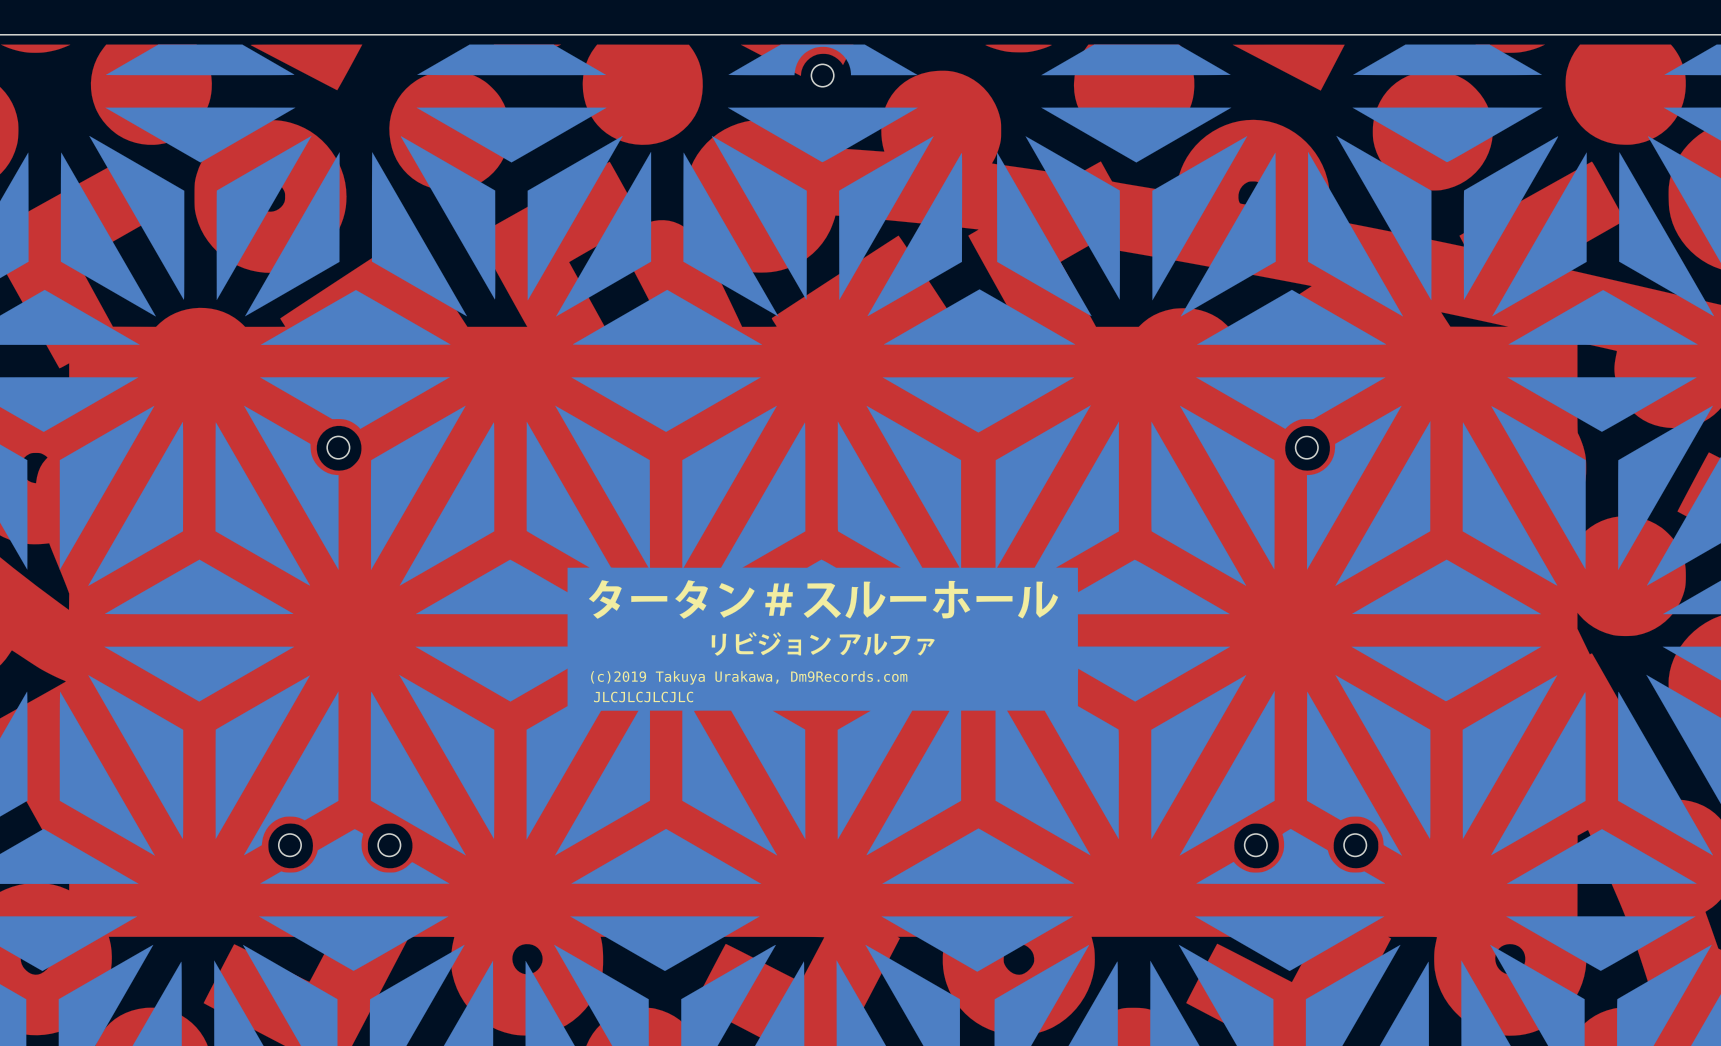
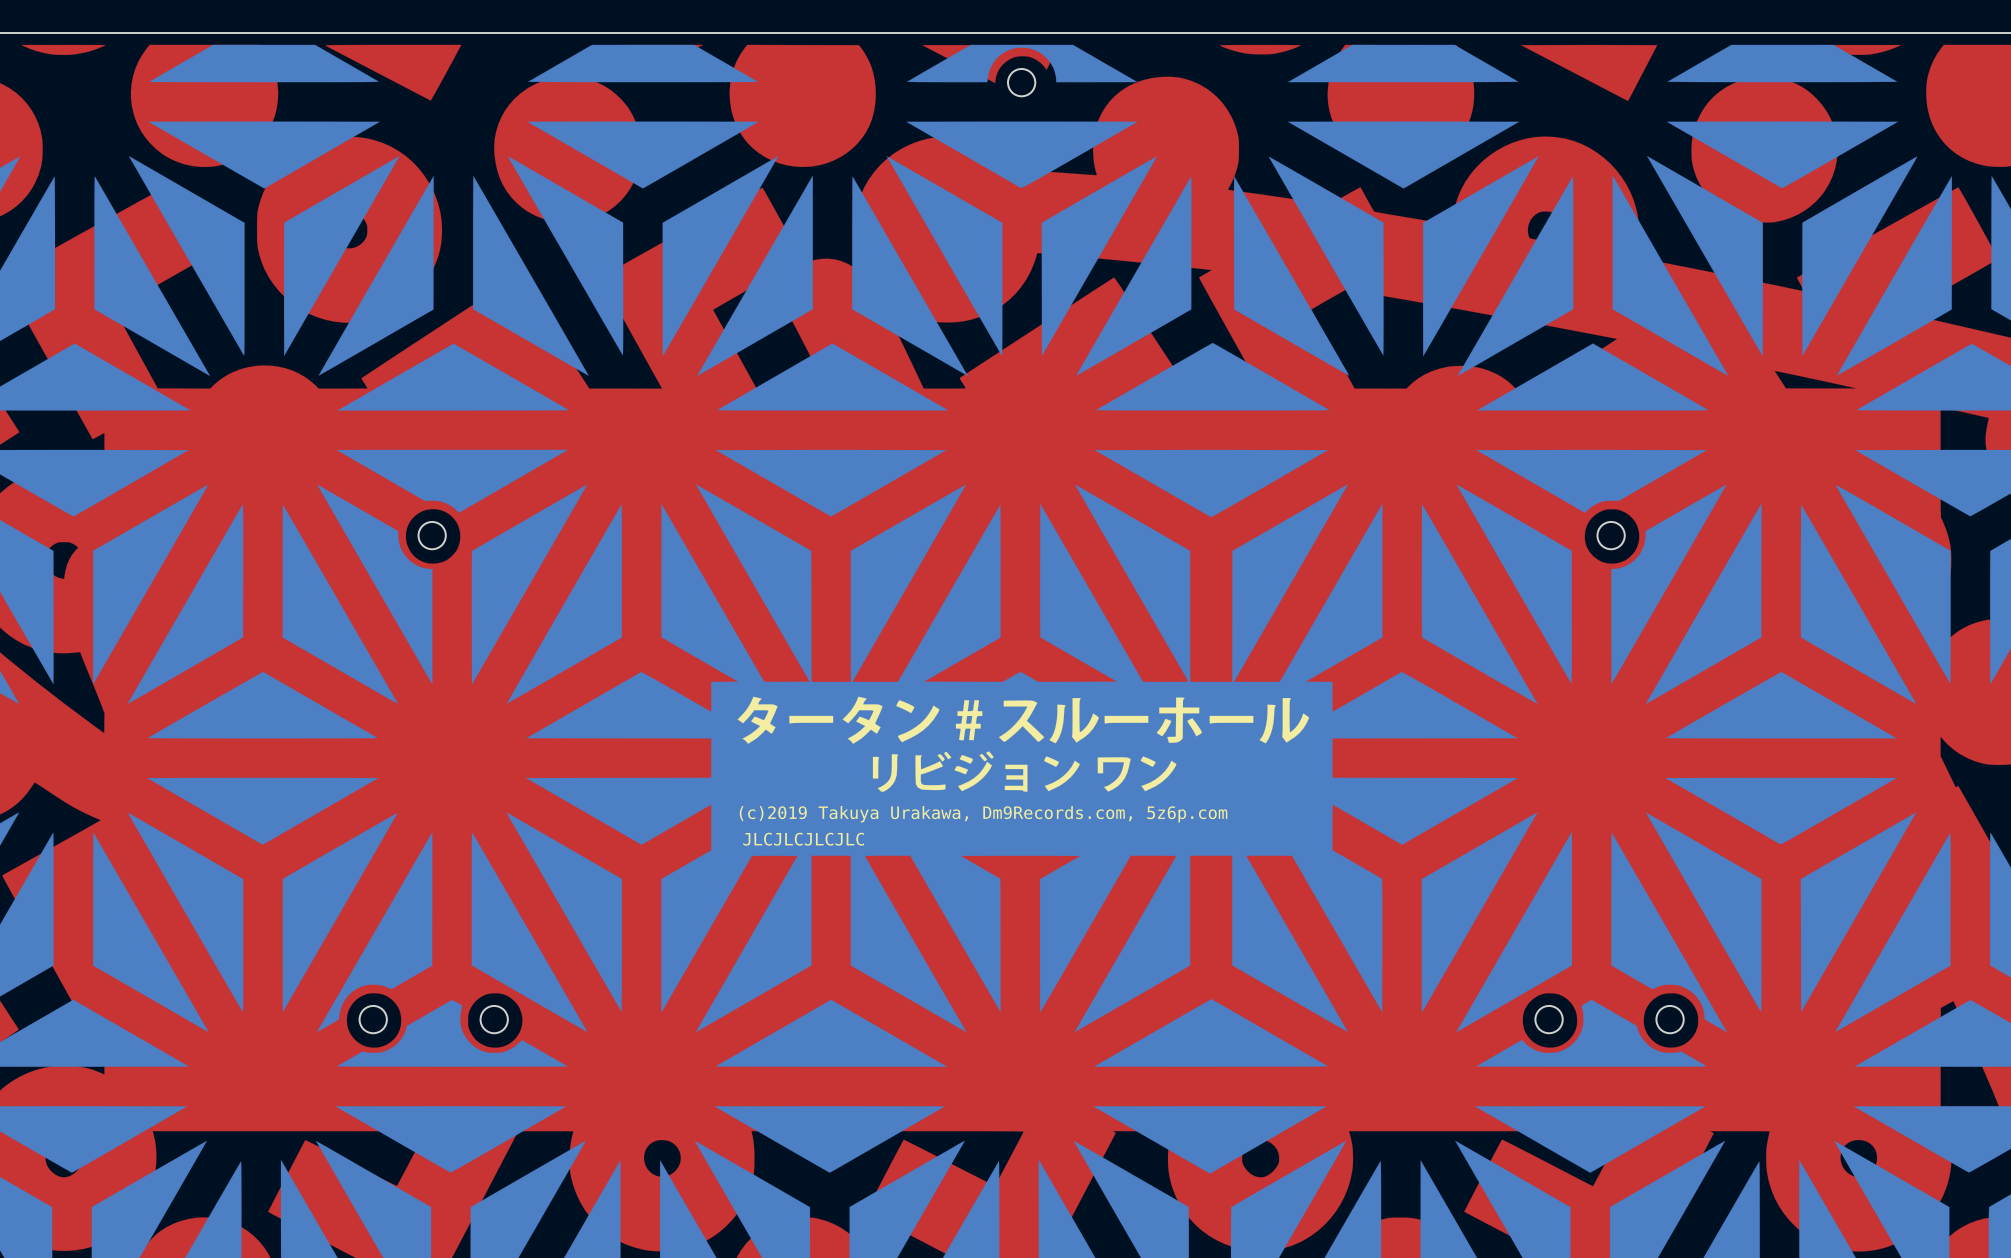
drawing shape: [588, 580, 1059, 656] -> [737, 696, 1309, 792]
text: (c)2019 Takuya Urakawa, Dm9Records.com (749, 677) -> (c)2019 Takuya Urakawa, Dm9Records.com, 5z6p.com (983, 814)

